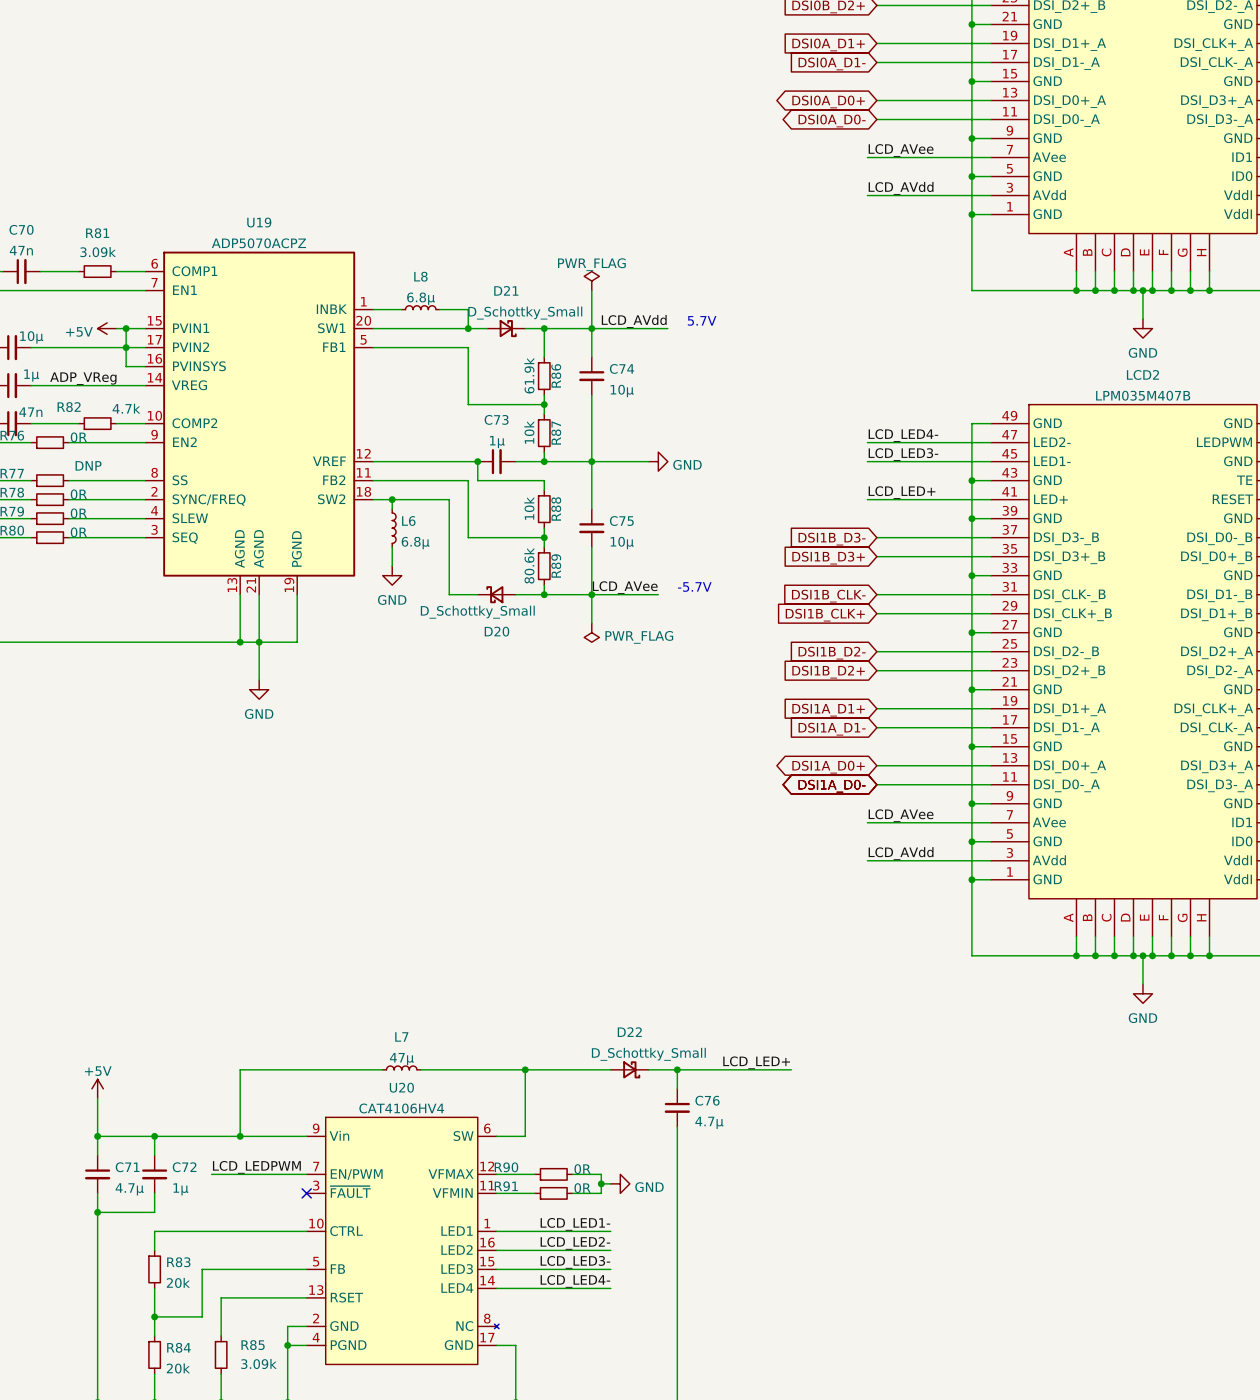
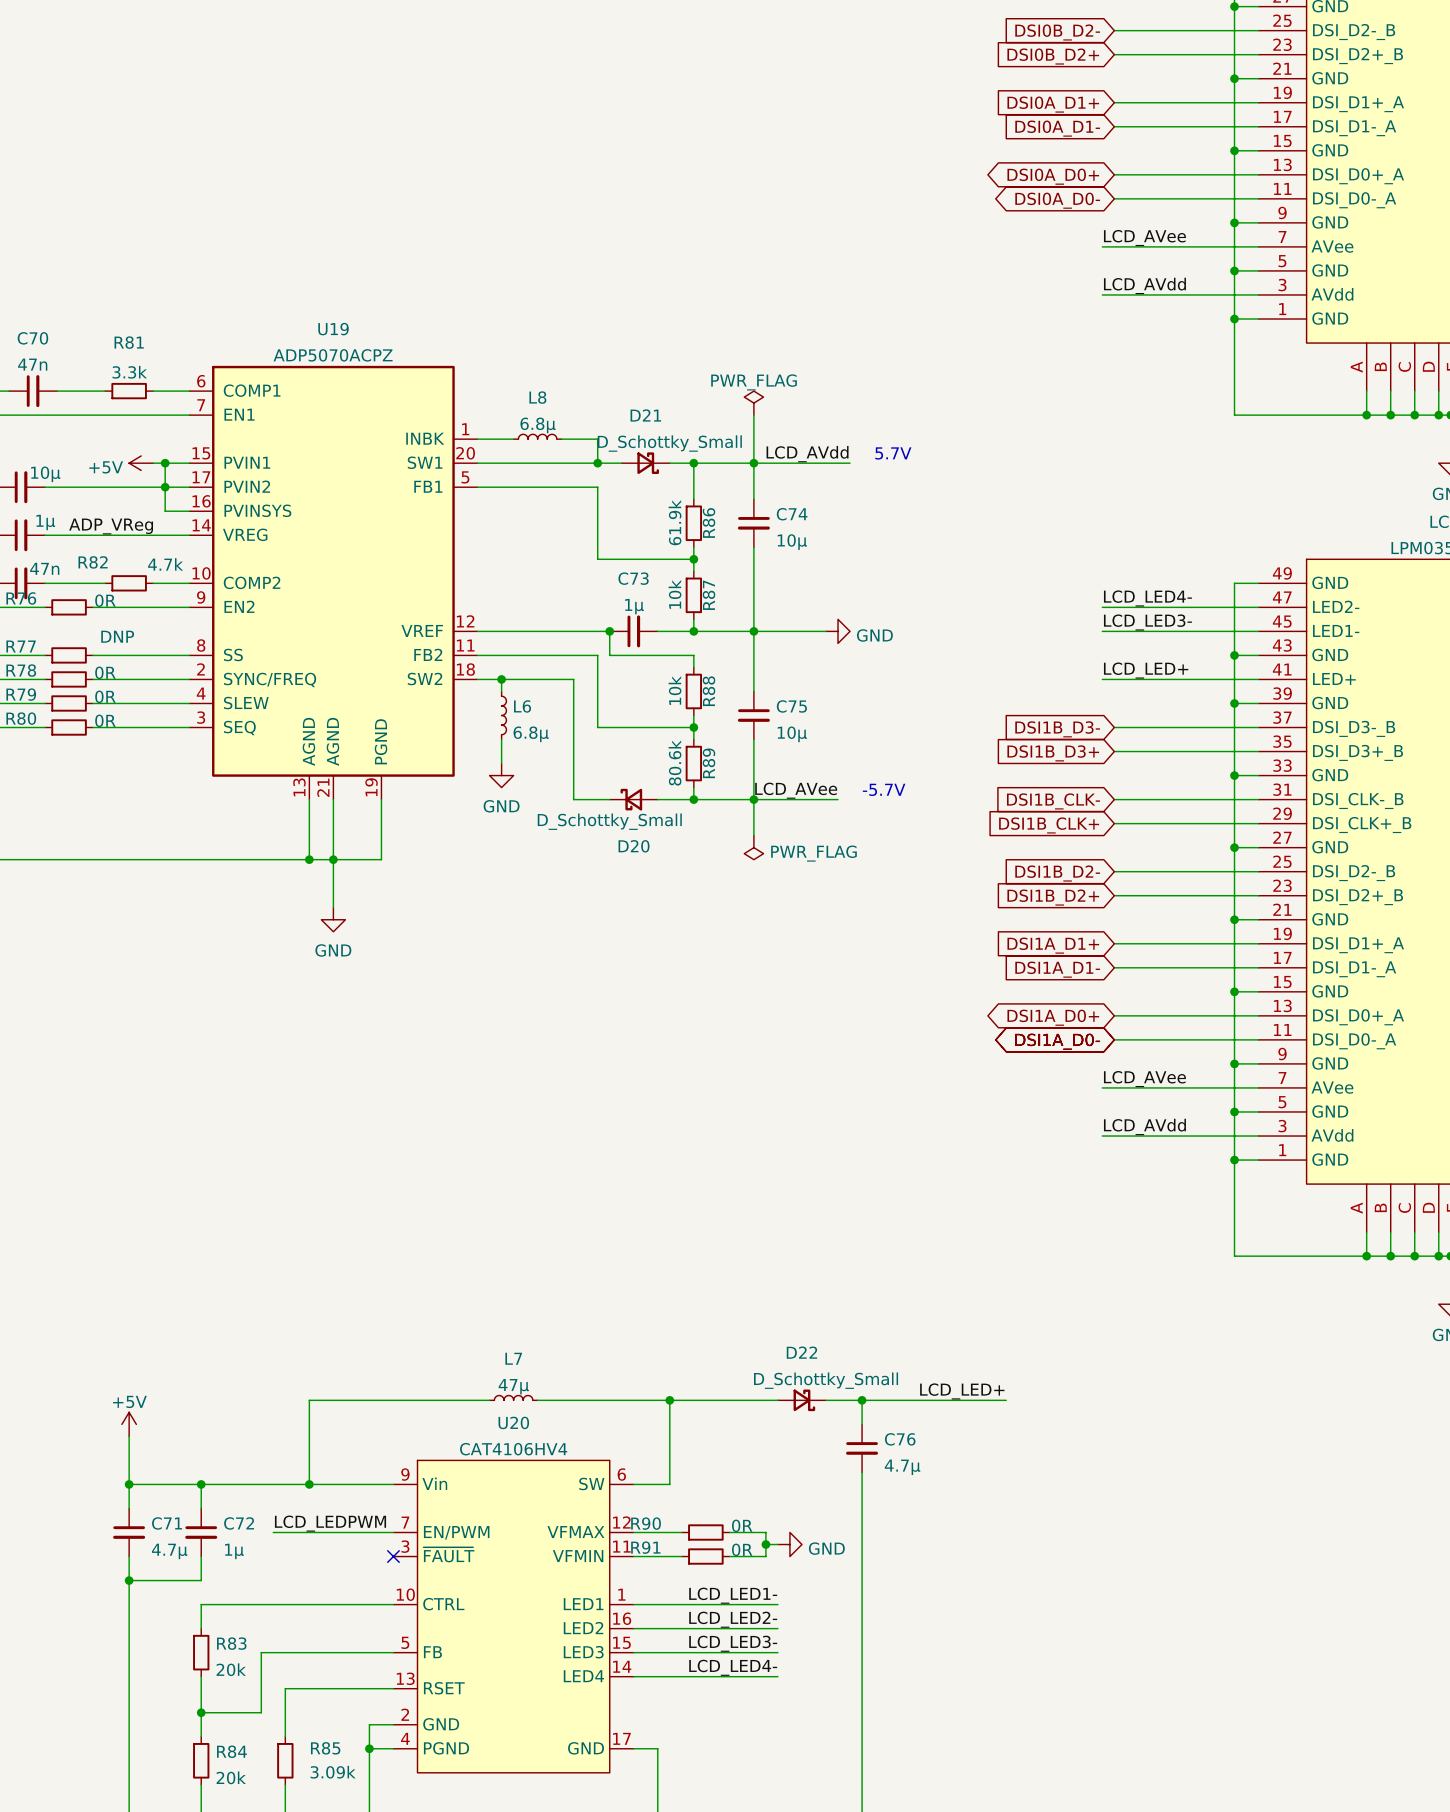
R81 value: 3.09k (98, 252) -> 3.3k (129, 372)
U20 symbol: [306, 1116, 500, 1366] -> [393, 1459, 634, 1774]

